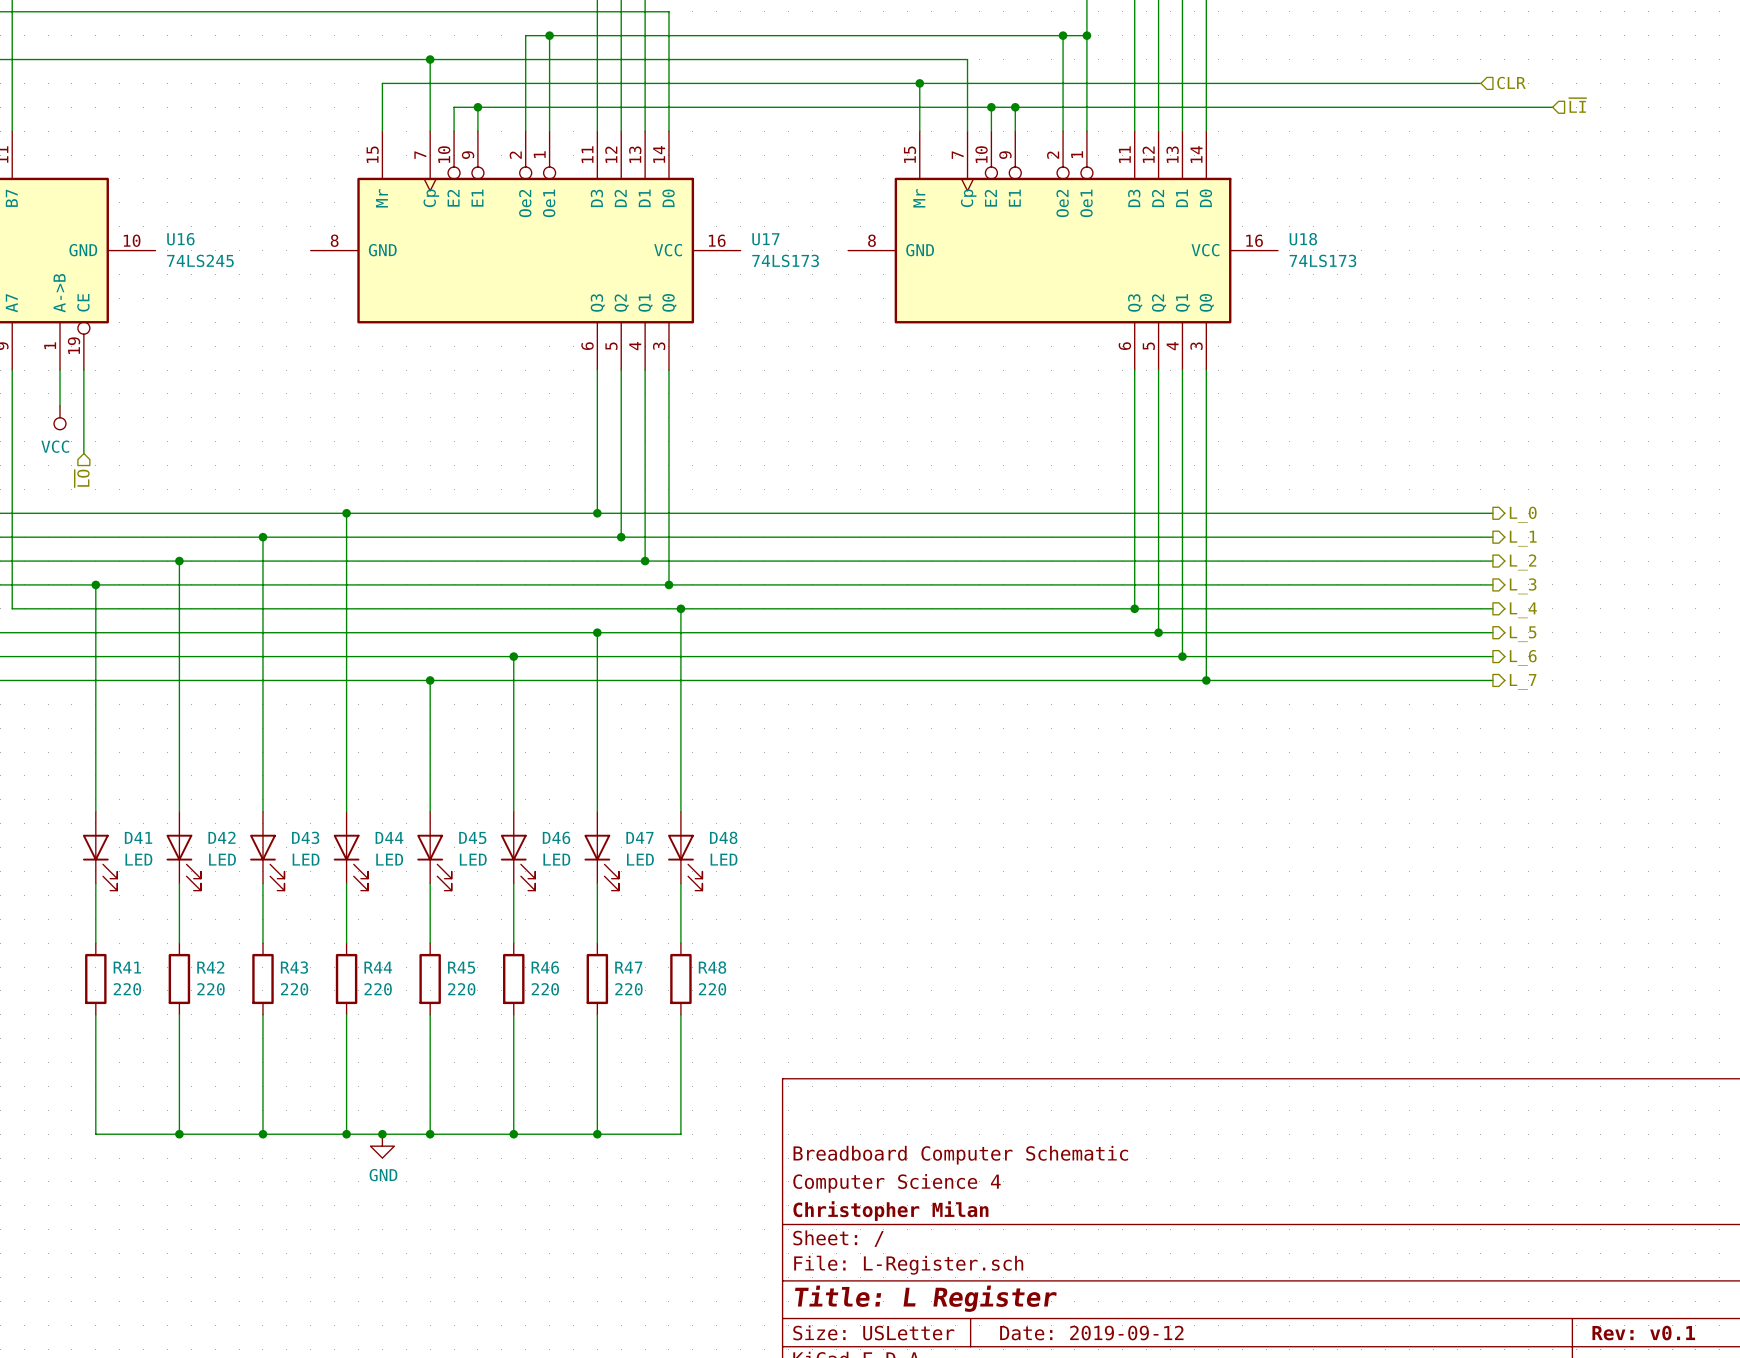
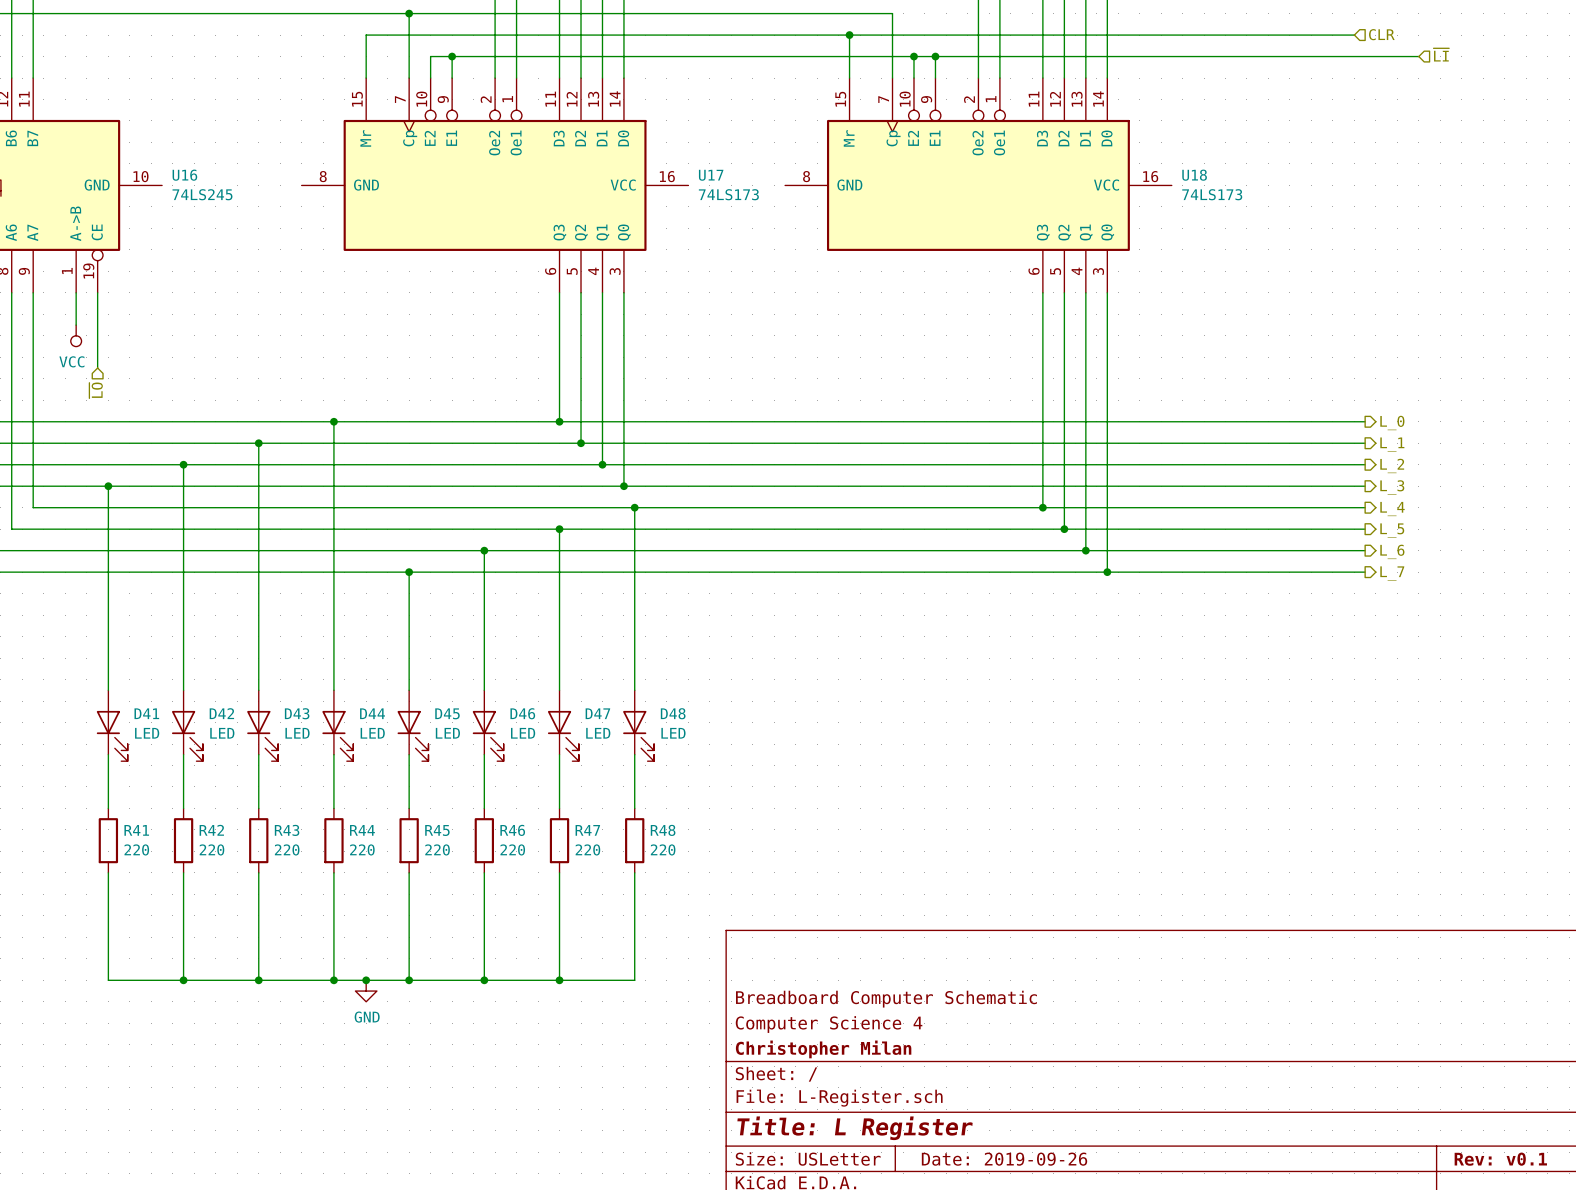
title block: Date: 2019-09-12 (1091, 1333) -> Date: 2019-09-26 (1004, 1159)

